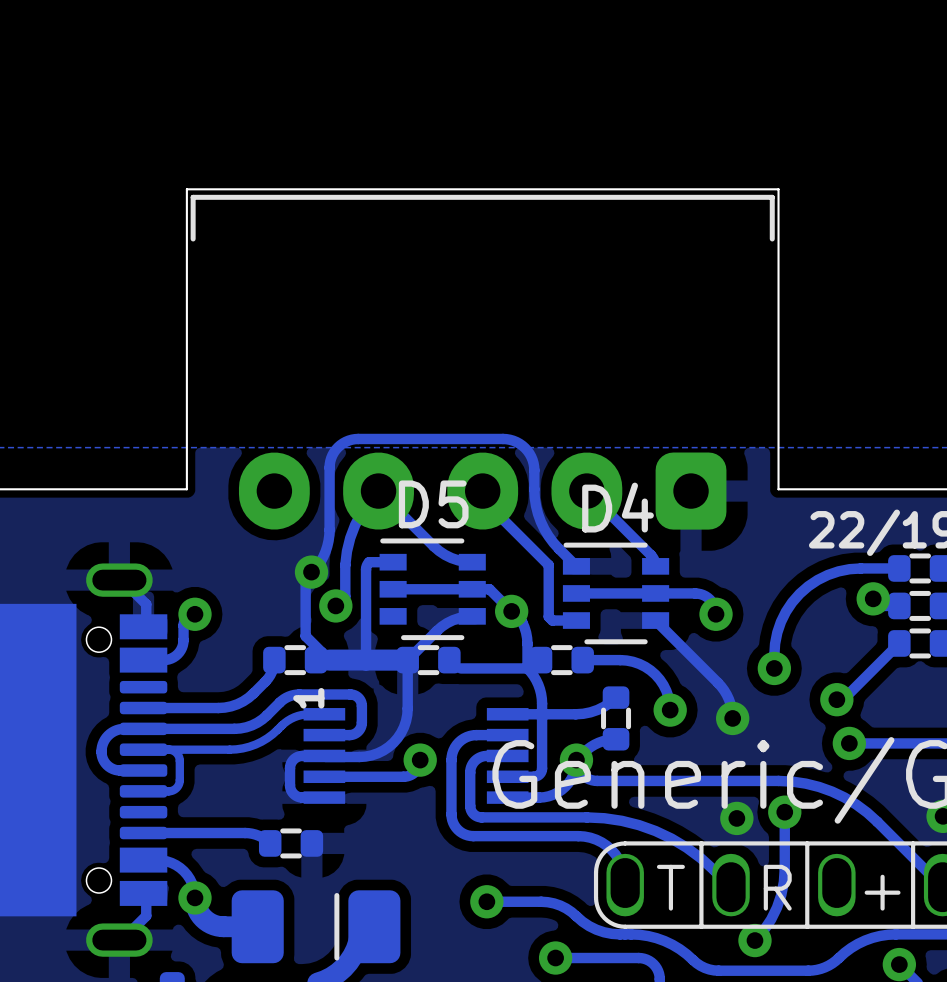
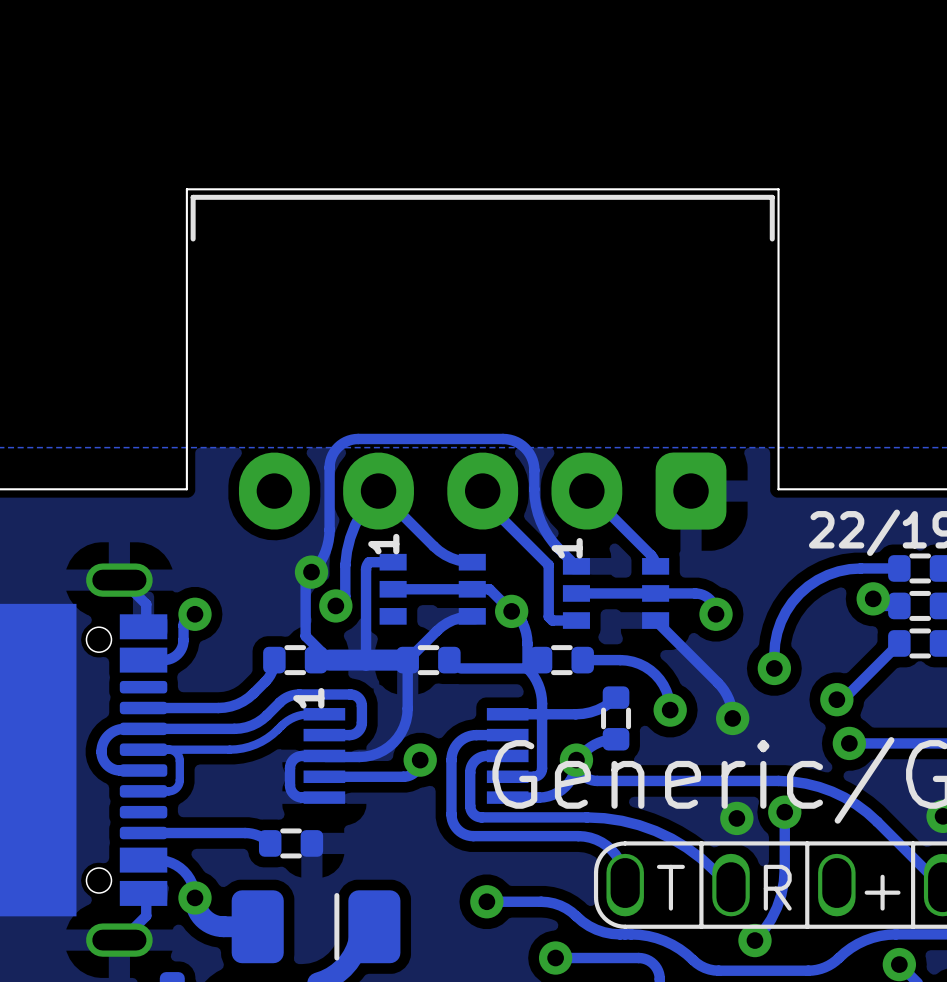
D5: (432, 589) -> none
part: none -> (432, 589)
D4: (616, 593) -> none
part: none -> (616, 593)

